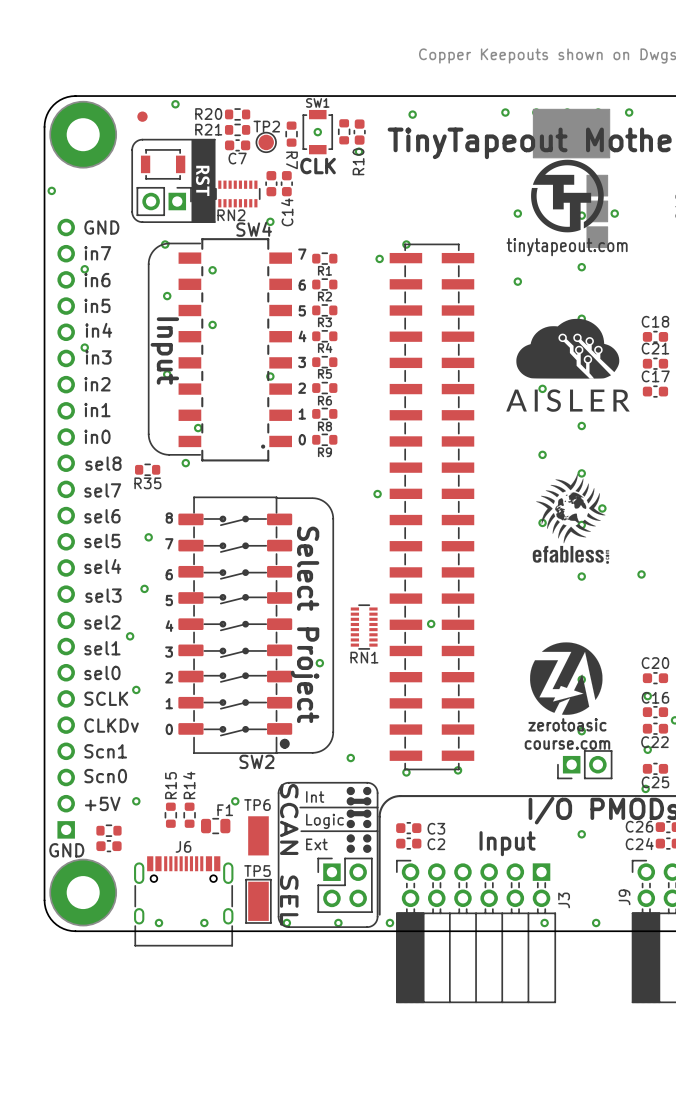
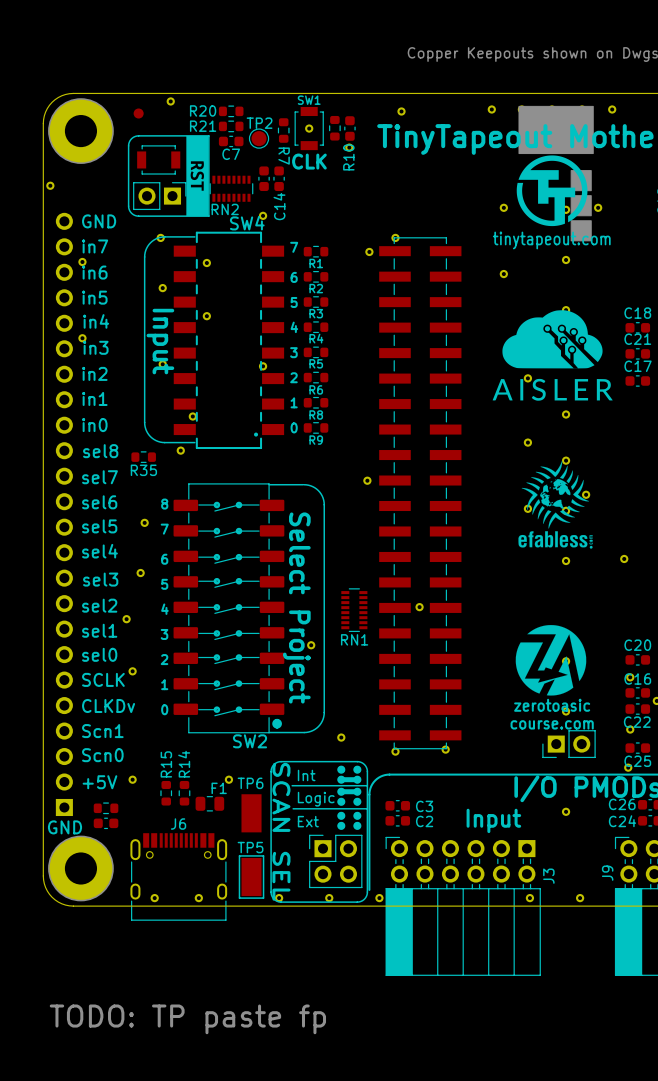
text: none -> TODO: TP paste fp (187, 1019)

